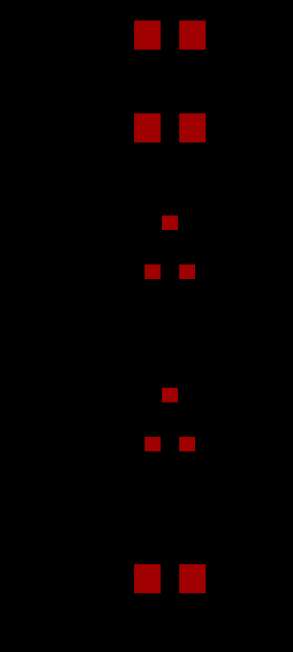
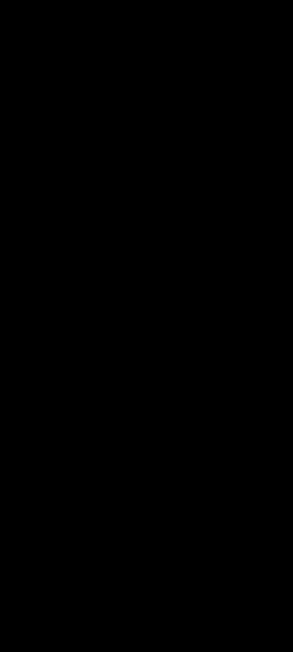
part: (169, 35) -> none
part: (169, 127) -> none
part: (169, 247) -> none
part: (169, 419) -> none
part: (169, 578) -> none

